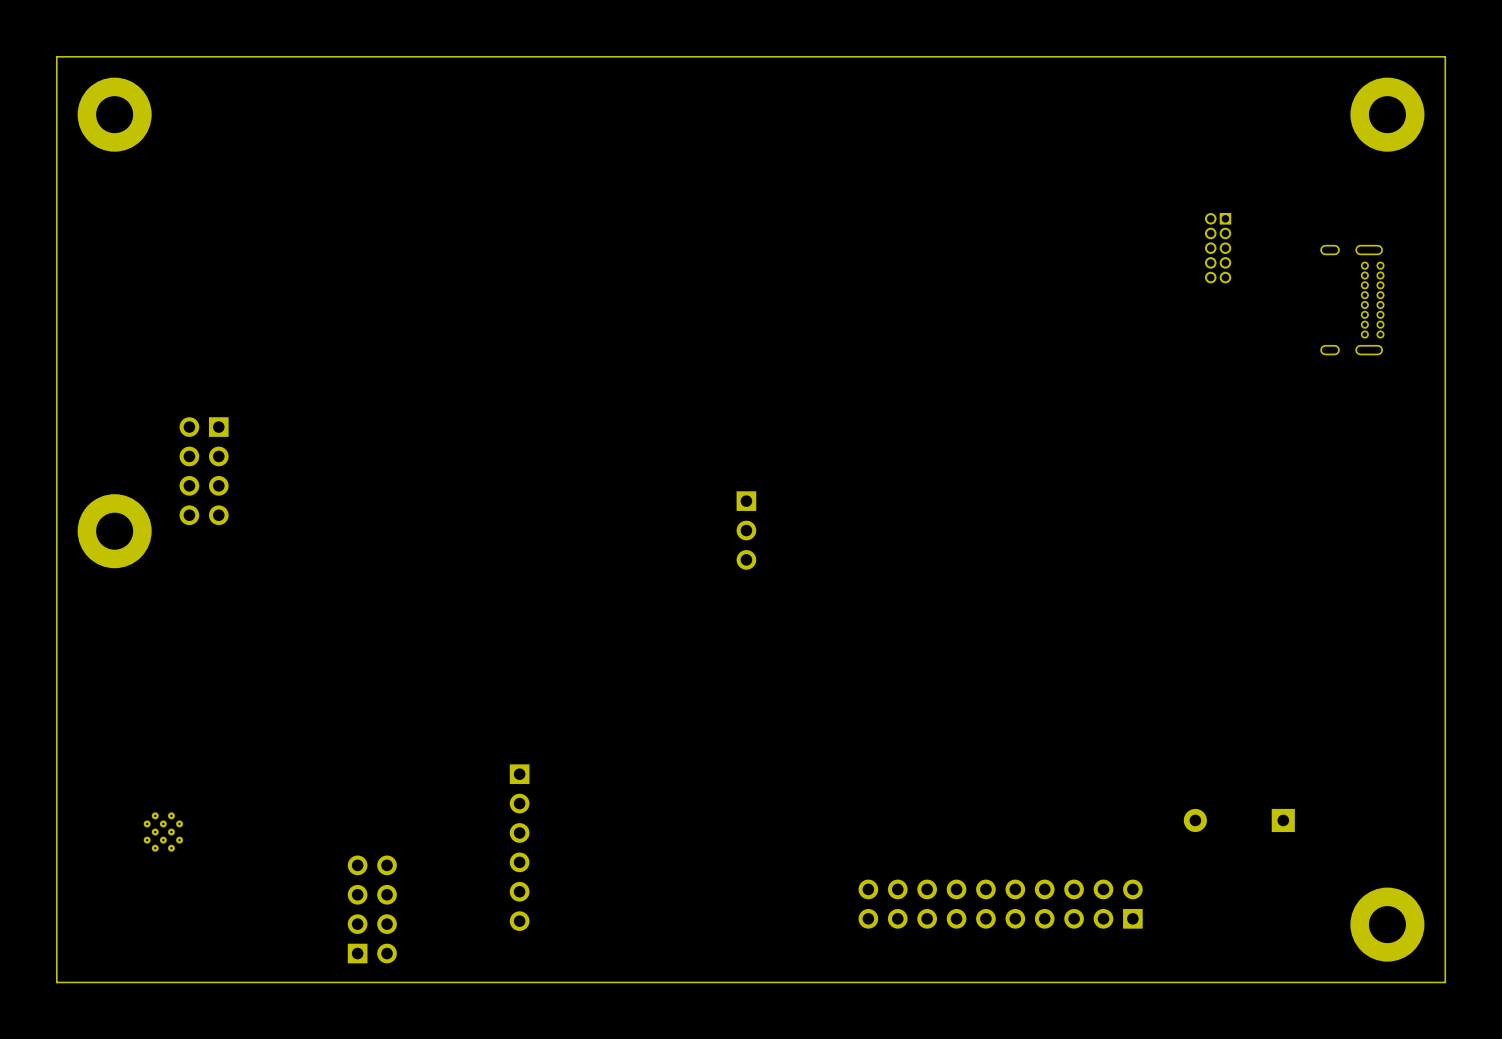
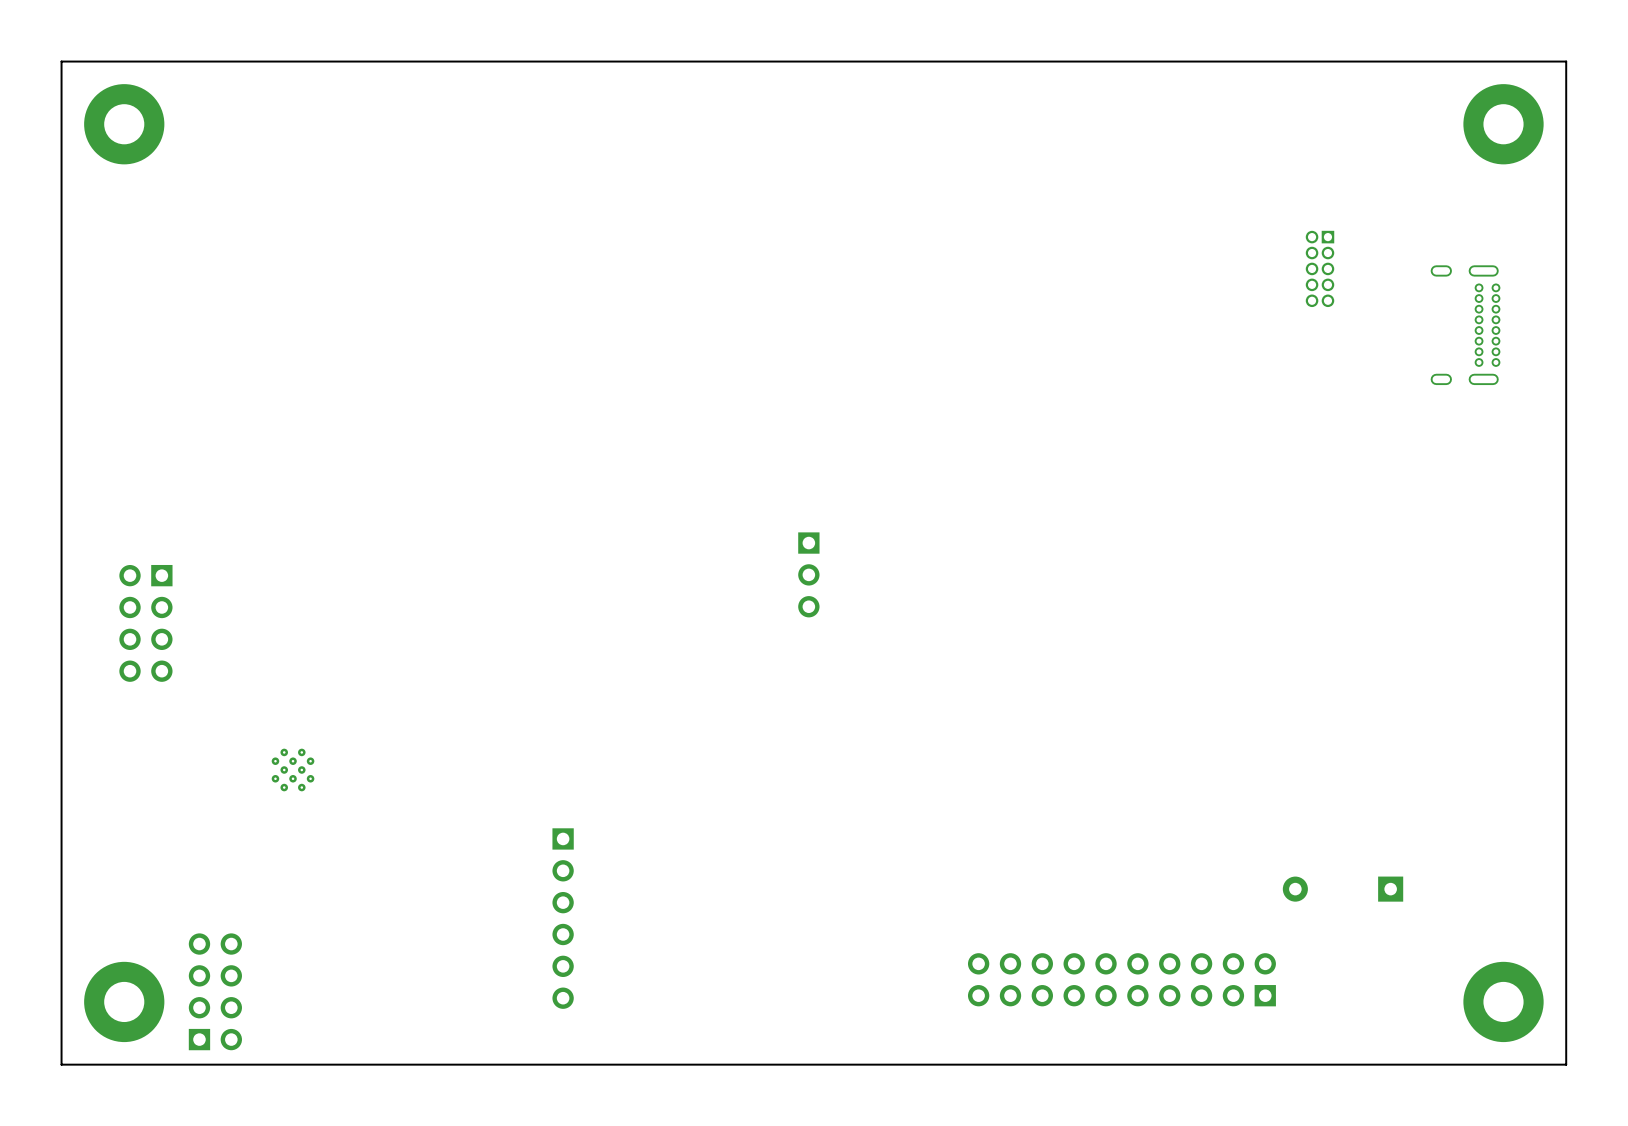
part position: (204, 471) -> (145, 623)
part: (114, 531) -> none
part position: (163, 832) -> (293, 769)
part position: (1000, 904) -> (1121, 979)
part position: (372, 909) -> (215, 991)
part: none -> (124, 1001)

